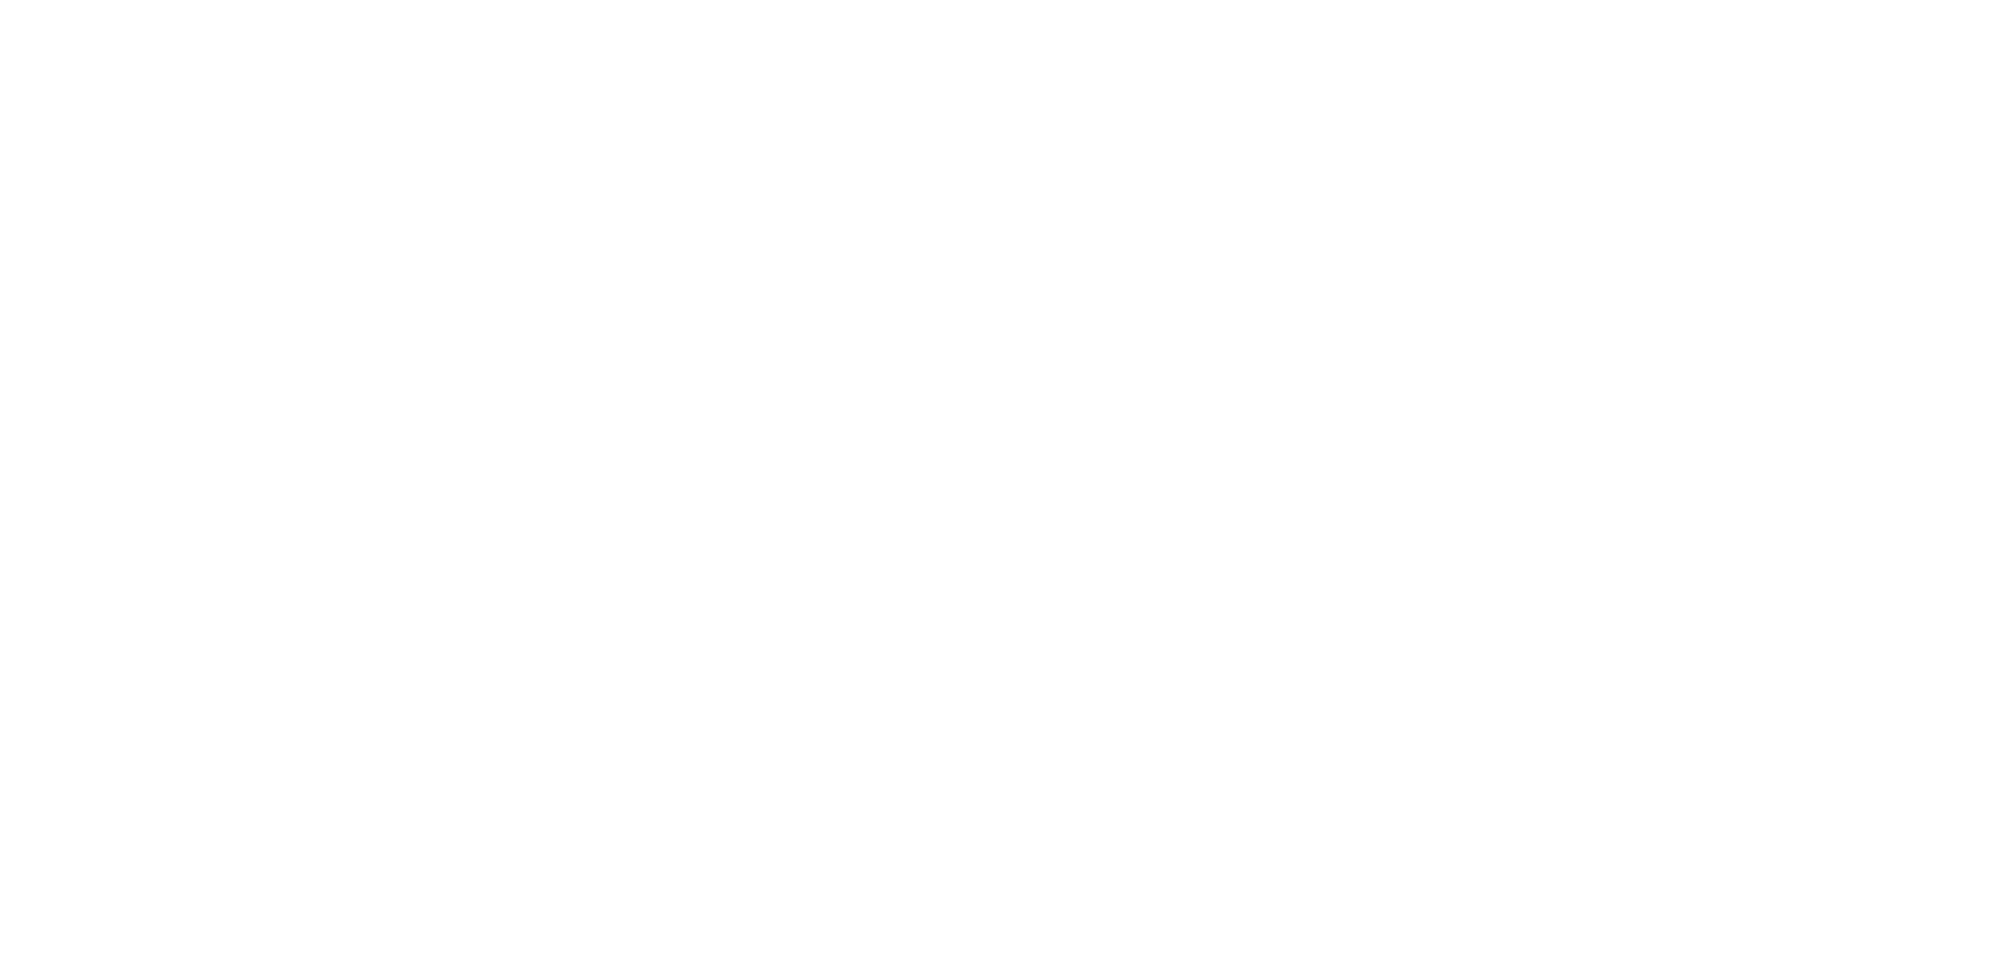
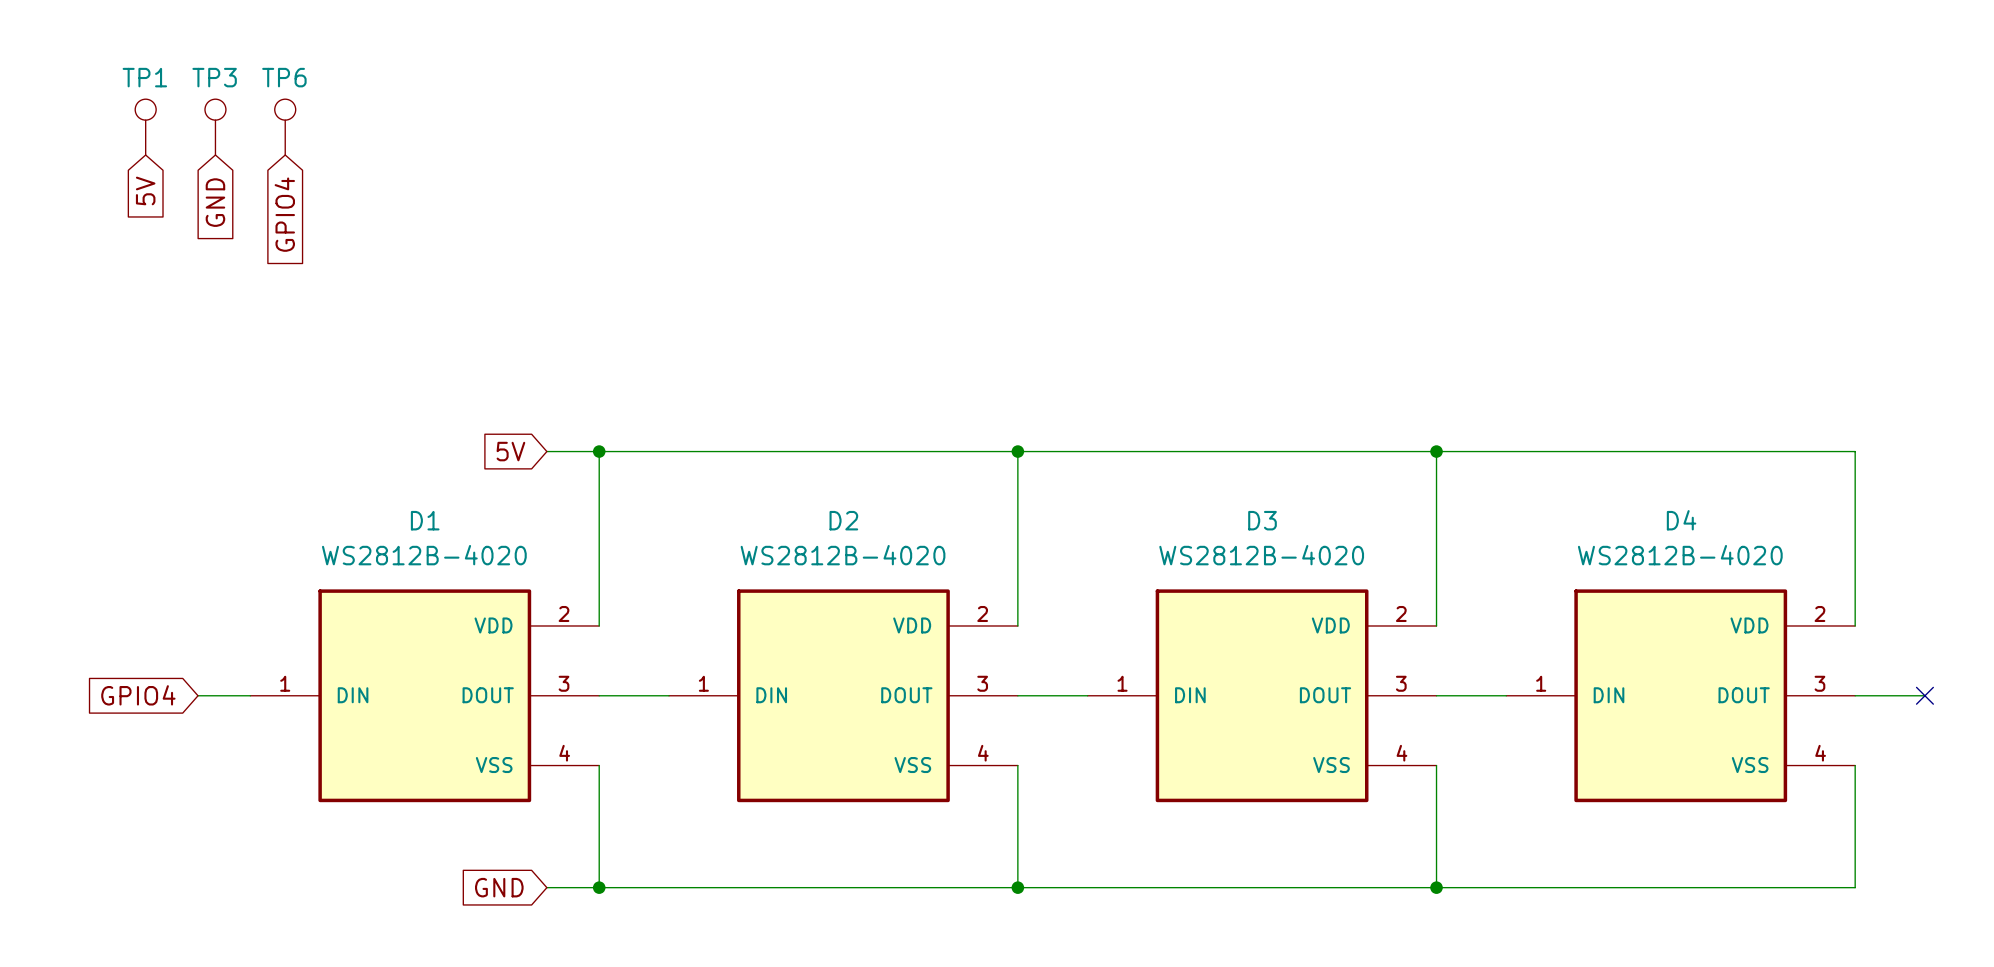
TP1: none -> (145, 127)
TP3: none -> (215, 127)
TP6: none -> (285, 127)
global label: none -> 5V (145, 190)
global label: none -> GND (215, 202)
global label: none -> GPIO4 (284, 214)
global label: none -> 5V (510, 451)
wire: none -> (546, 451) (1855, 451) (1855, 625)
wire: none -> (599, 451) (599, 625)
junction: none -> (599, 451)
wire: none -> (1017, 451) (1017, 625)
junction: none -> (1017, 451)
wire: none -> (1436, 451) (1436, 625)
junction: none -> (1436, 451)
global label: none -> GPIO4 (138, 695)
wire: none -> (198, 695) (250, 695)
D1: none -> WS2812B-4020 (424, 695)
wire: none -> (599, 695) (668, 695)
D2: none -> WS2812B-4020 (843, 695)
wire: none -> (1017, 695) (1087, 695)
D3: none -> WS2812B-4020 (1262, 695)
wire: none -> (1436, 695) (1506, 695)
D4: none -> WS2812B-4020 (1680, 695)
wire: none -> (1855, 695) (1924, 695)
no-connect mark: none -> (1924, 695)
wire: none -> (599, 765) (599, 887)
wire: none -> (1017, 765) (1017, 887)
wire: none -> (1436, 765) (1436, 887)
wire: none -> (1855, 765) (1855, 887) (546, 887)
global label: none -> GND (499, 887)
junction: none -> (599, 887)
junction: none -> (1017, 887)
junction: none -> (1436, 887)

